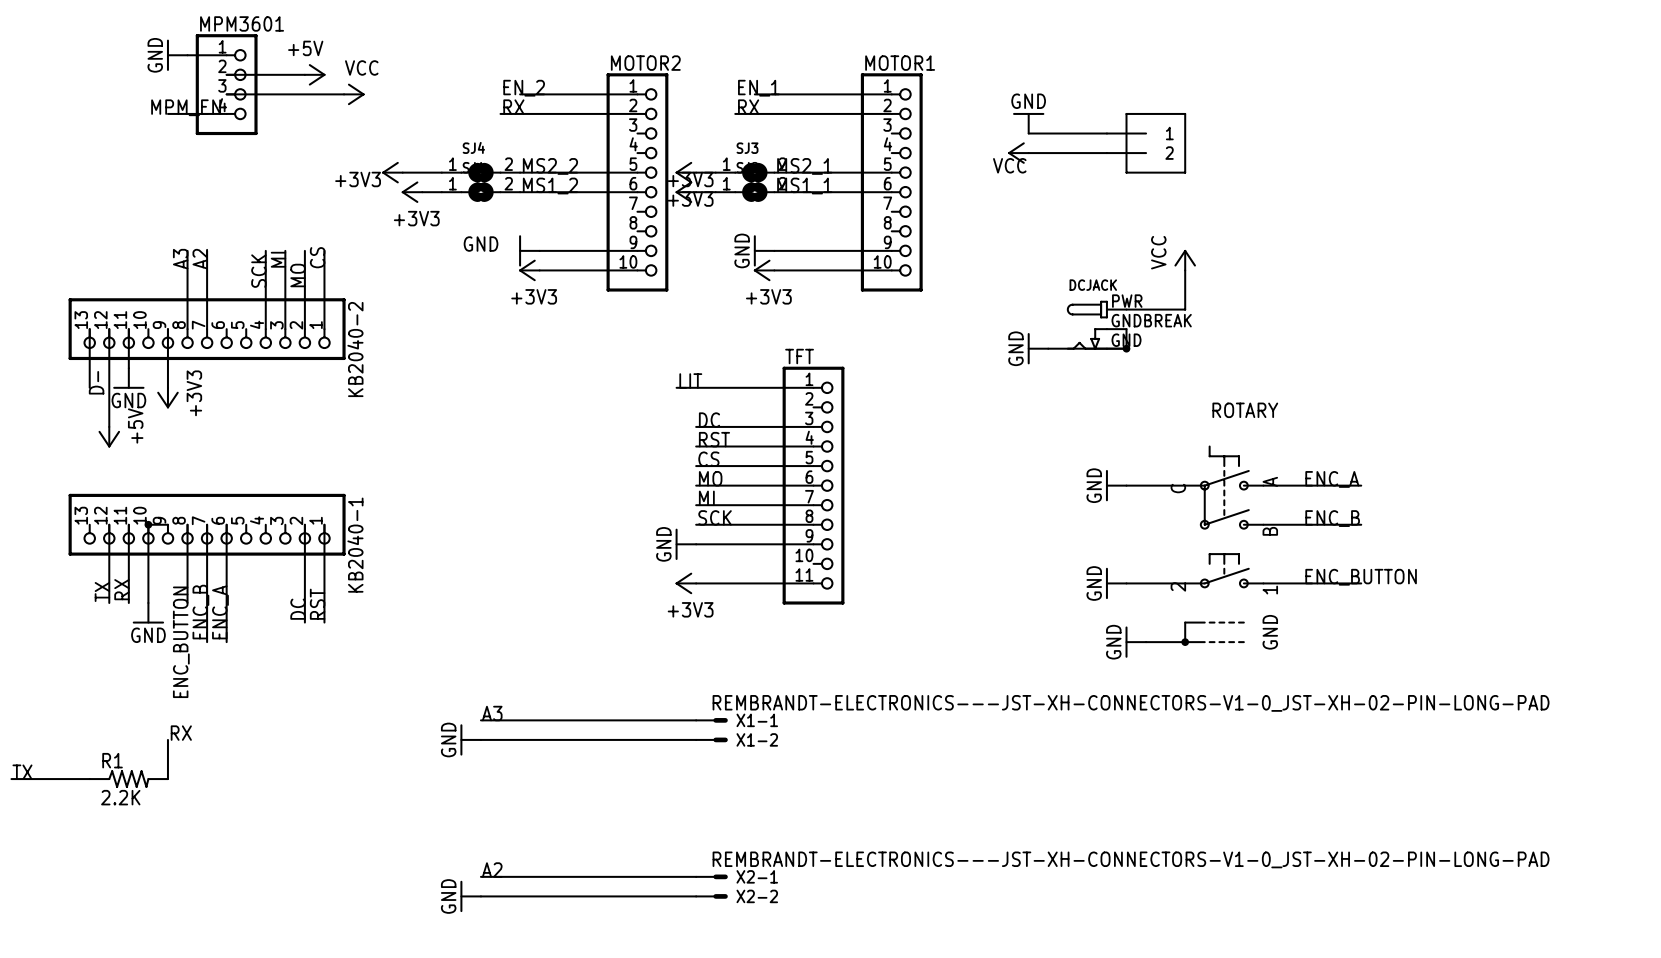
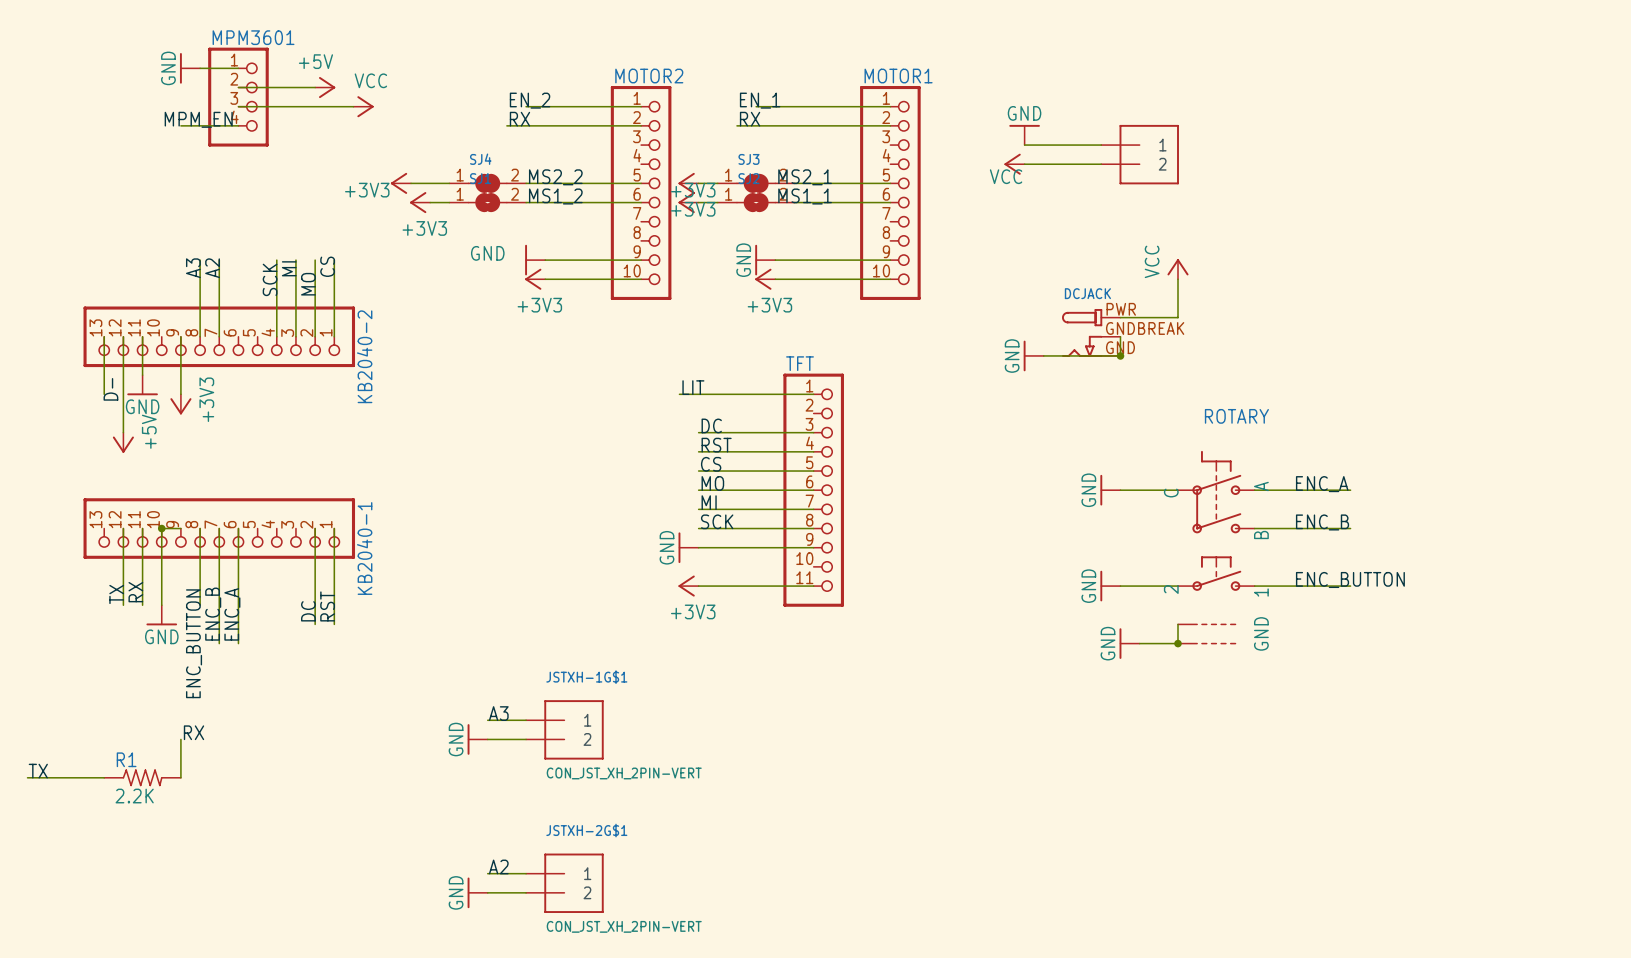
wire: (520, 720) (696, 720) -> none
X1-1: REMBRANDT-ELECTRONICS---JST-XH-CONNECTORS-V1-0_JST-XH-02-PIN-LONG-PAD (711, 720) -> none
JSTXH-1G$1: none -> CON_JST_XH_2PIN-VERT (564, 729)
wire: (520, 739) (696, 739) -> none
X1-2: (711, 739) -> none
wire: (520, 876) (696, 876) -> none
X2-1: REMBRANDT-ELECTRONICS---JST-XH-CONNECTORS-V1-0_JST-XH-02-PIN-LONG-PAD (711, 876) -> none
JSTXH-2G$1: none -> CON_JST_XH_2PIN-VERT (564, 883)
wire: (520, 896) (696, 896) -> none
X2-2: (711, 896) -> none

